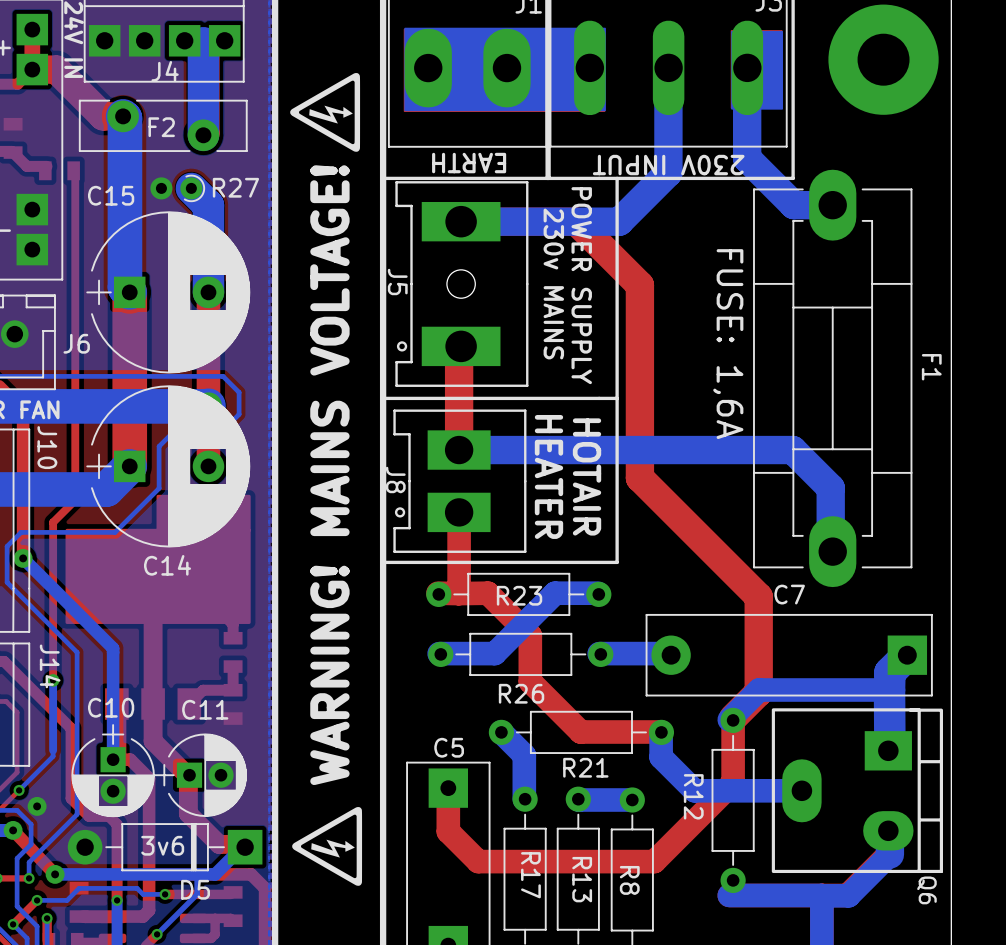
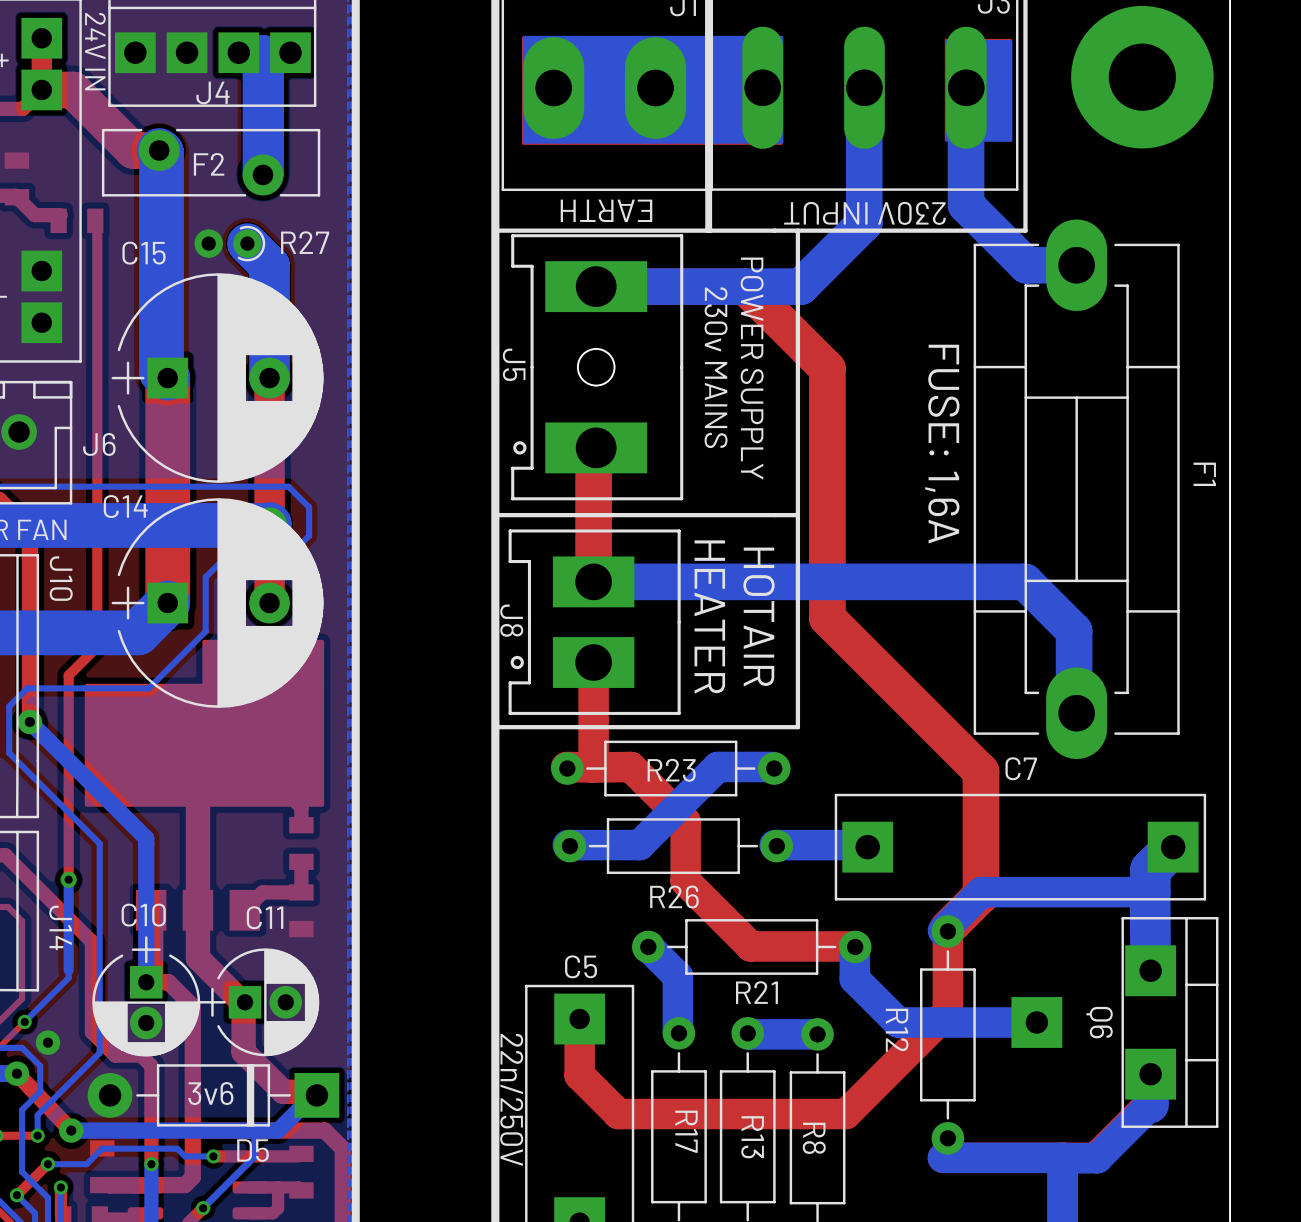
drawing: [290, 73, 361, 152] -> none
text: WARNING! MAINS VOLTAGE! (329, 475) -> none
C14 name position: C14 (167, 565) -> C14 (125, 506)
C7 footprint: [645, 613, 933, 697] -> [834, 793, 1207, 901]
J14 name position: J14 (50, 666) -> J14 (60, 927)
Q6 footprint: [771, 708, 943, 874] -> [1011, 917, 1219, 1128]
drawing: [292, 807, 363, 886] -> none
C5 value: none -> 22n/250V (511, 1099)
Q6 name position: Q6 (926, 890) -> Q6 (1099, 1022)

